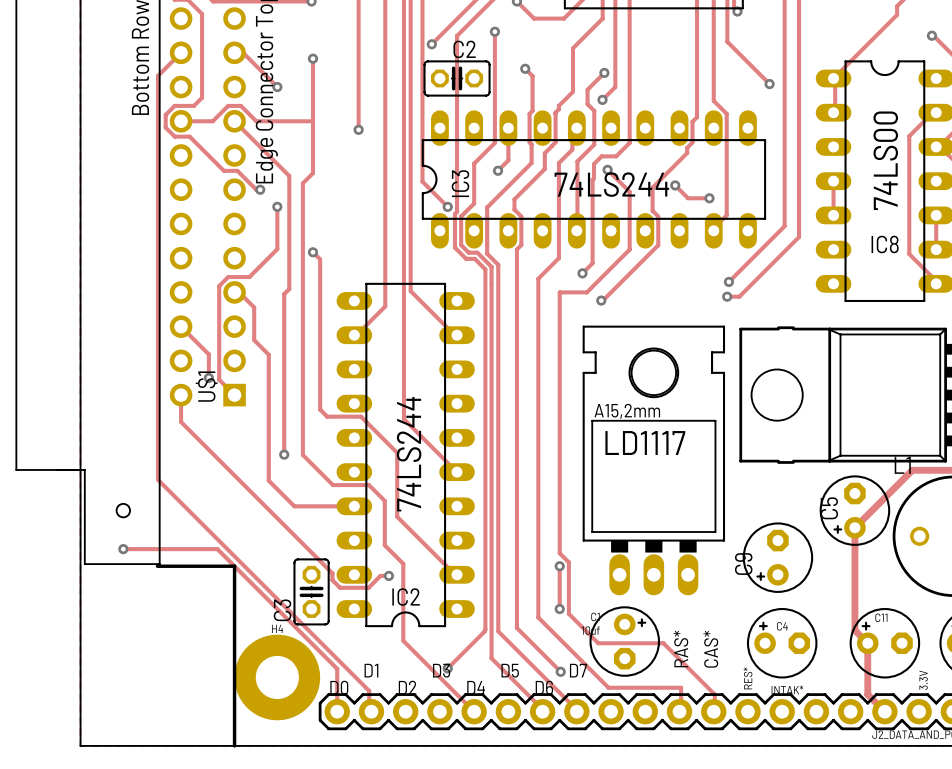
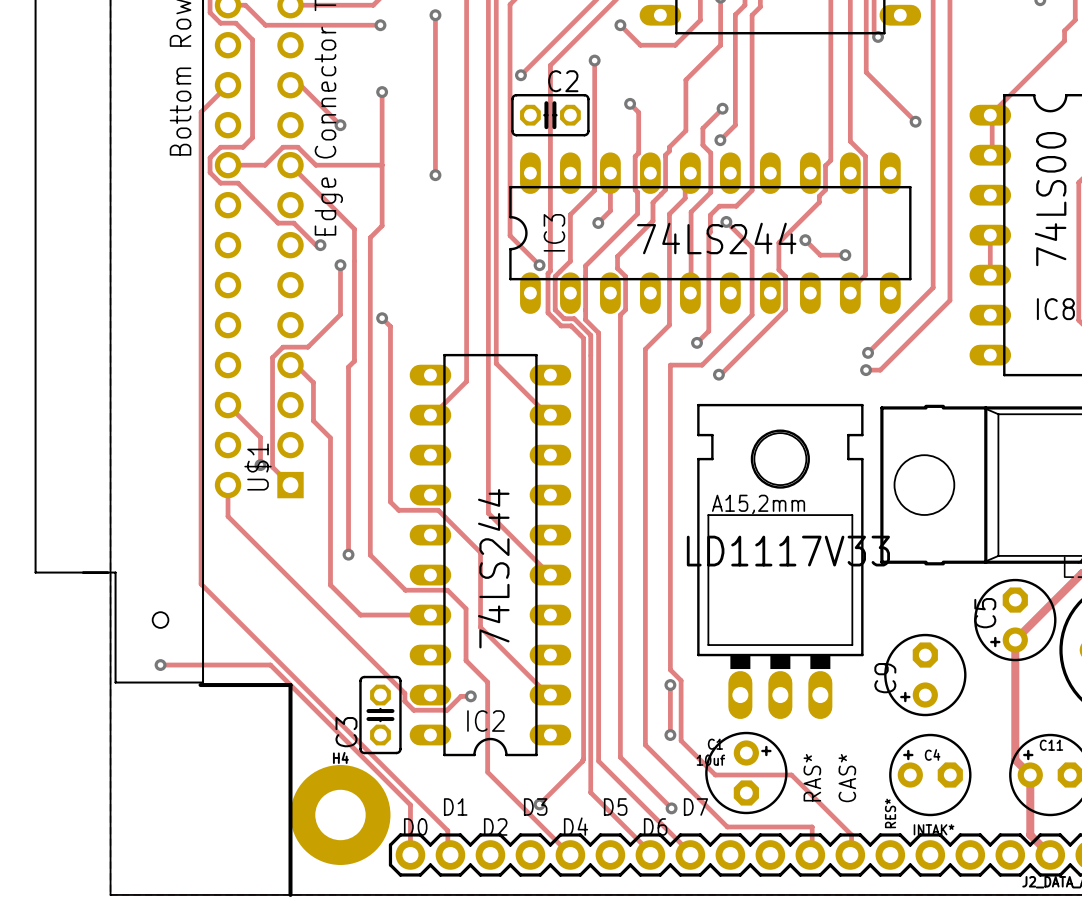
LD1117 name: LD1117 (645, 443) -> LD1117V33 (788, 551)

